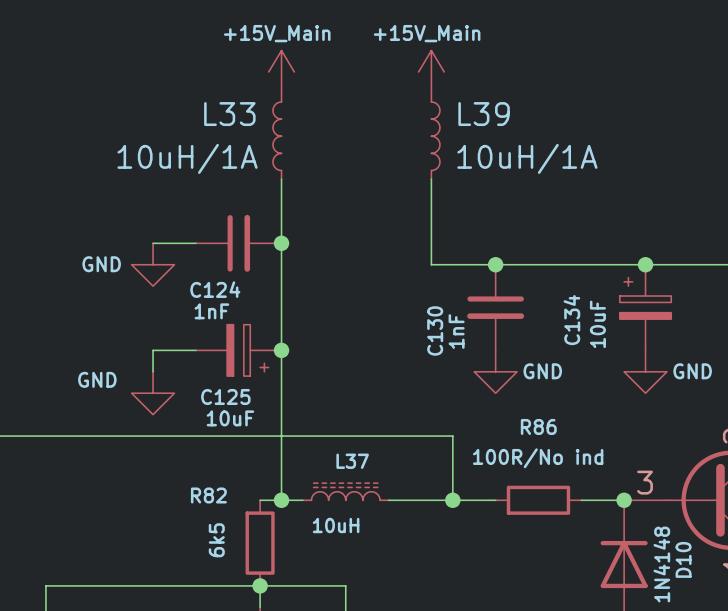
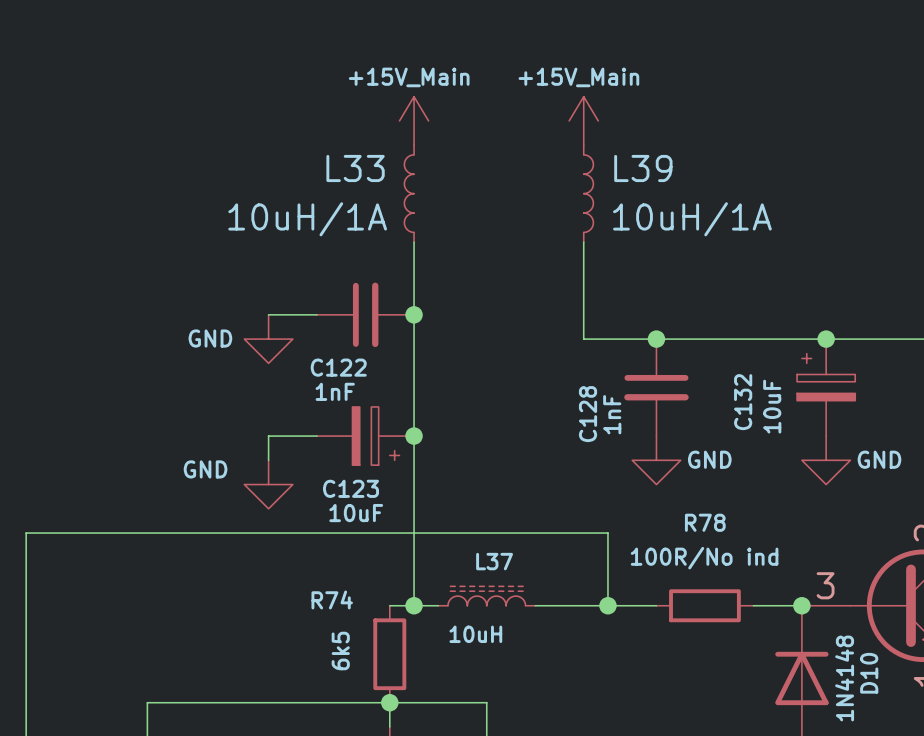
C124 name: C124 (215, 289) -> C122 (338, 367)
C134 name: C134 (571, 320) -> C132 (743, 402)
C130 name: C130 (435, 330) -> C128 (588, 414)
C125 name: C125 (225, 396) -> C123 (351, 488)
R86 name: R86 (538, 426) -> R78 (705, 522)
R82 name: R82 (208, 495) -> R74 (332, 599)

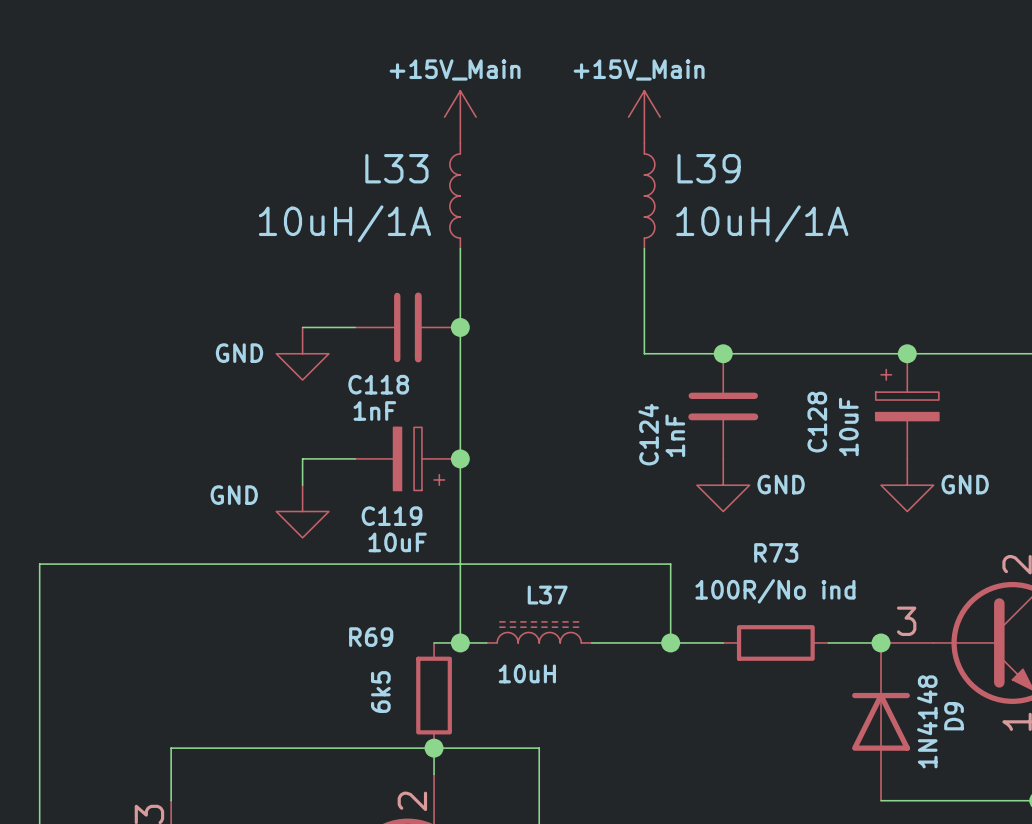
C122 name: C122 (338, 367) -> C118 (378, 384)
C132 name: C132 (743, 402) -> C128 (817, 422)
C128 name: C128 (588, 414) -> C124 (648, 434)
C123 name: C123 (351, 488) -> C119 (391, 516)
R78 name: R78 (705, 522) -> R73 (776, 552)
R74 name: R74 (332, 599) -> R69 (371, 637)
D10 name: D10 (869, 673) -> D9 (954, 716)

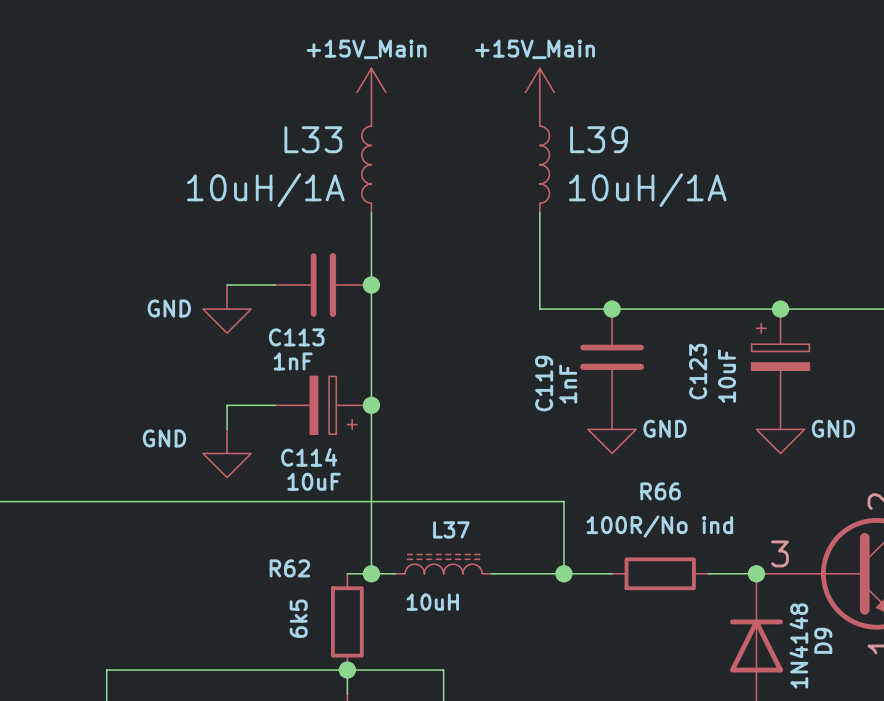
C118 name: C118 (378, 384) -> C113 (296, 337)
C128 name: C128 (817, 422) -> C123 (698, 371)
C124 name: C124 (648, 434) -> C119 (544, 383)
C119 name: C119 (391, 516) -> C114 (309, 457)
R73 name: R73 (776, 552) -> R66 (660, 491)
R69 name: R69 (371, 637) -> R62 (289, 568)

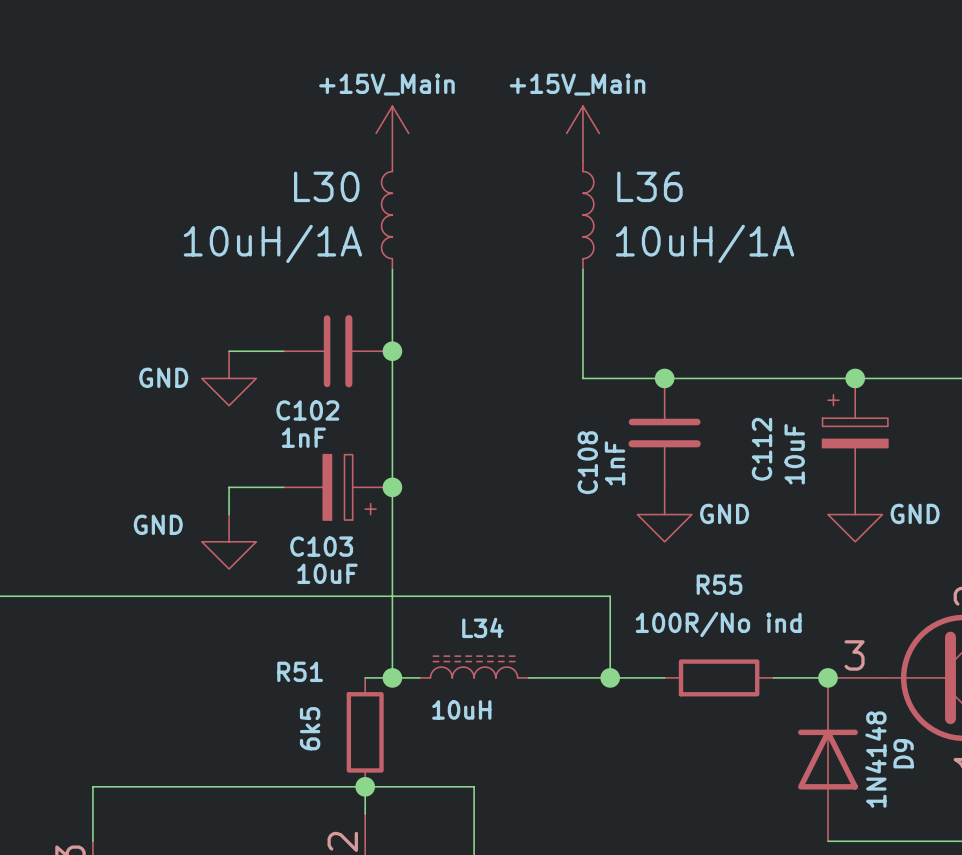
L33 name: L33 (313, 139) -> L30 (326, 186)
L39 name: L39 (599, 139) -> L36 (649, 186)
C113 name: C113 (296, 337) -> C102 (307, 410)
C123 name: C123 (698, 371) -> C112 (762, 449)
C119 name: C119 (544, 383) -> C108 (587, 462)
C114 name: C114 (309, 457) -> C103 (321, 546)
R66 name: R66 (660, 491) -> R55 (719, 584)
L37 name: L37 (451, 529) -> L34 (482, 627)
R62 name: R62 (289, 568) -> R51 (300, 671)

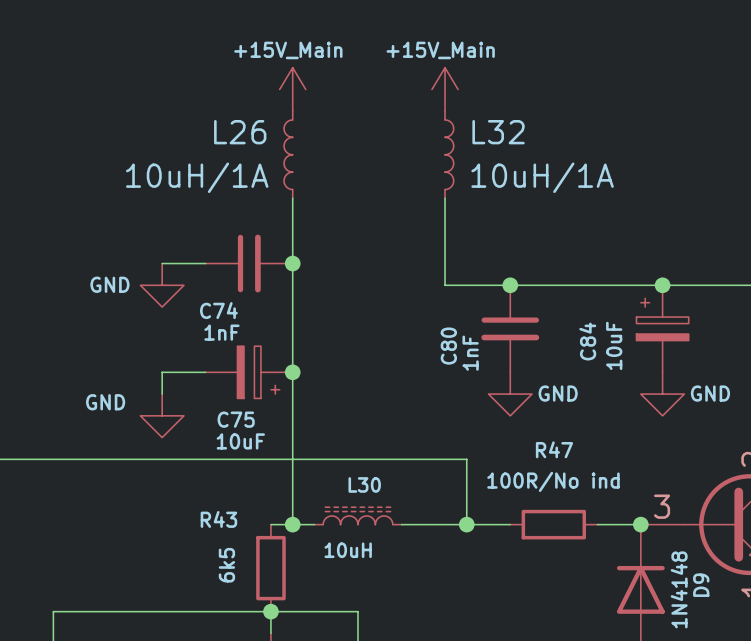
L30 name: L30 (326, 186) -> L26 (240, 132)
L36 name: L36 (649, 186) -> L32 (498, 132)
C102 name: C102 (307, 410) -> C74 (218, 310)
C112 name: C112 (762, 449) -> C84 (587, 341)
C108 name: C108 (587, 462) -> C80 (448, 346)
C103 name: C103 (321, 546) -> C75 (236, 419)
R55 name: R55 (719, 584) -> R47 (554, 449)
L34 name: L34 (482, 627) -> L30 (364, 484)
R51 name: R51 (300, 671) -> R43 (218, 519)

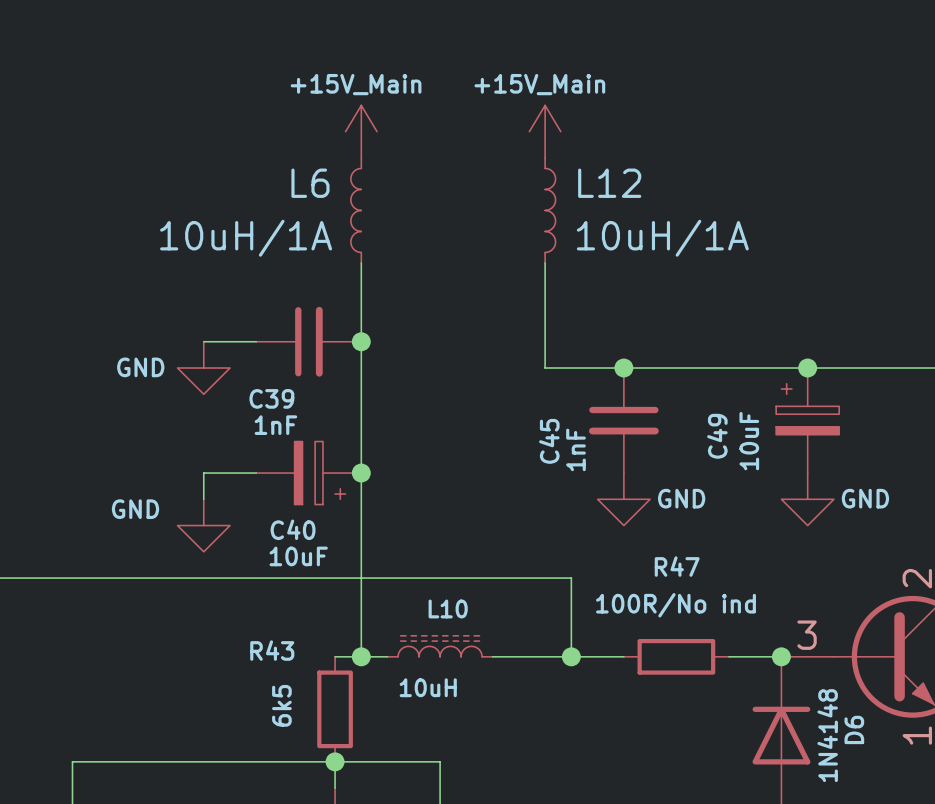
L26 name: L26 (240, 132) -> L6 (310, 183)
L32 name: L32 (498, 132) -> L12 (609, 183)
C74 name: C74 (218, 310) -> C39 (271, 398)
C84 name: C84 (587, 341) -> C49 (717, 436)
C80 name: C80 (448, 346) -> C45 (549, 441)
C75 name: C75 (236, 419) -> C40 (293, 529)
L30 name: L30 (364, 484) -> L10 (448, 608)
D9 name: D9 (701, 585) -> D6 (854, 729)

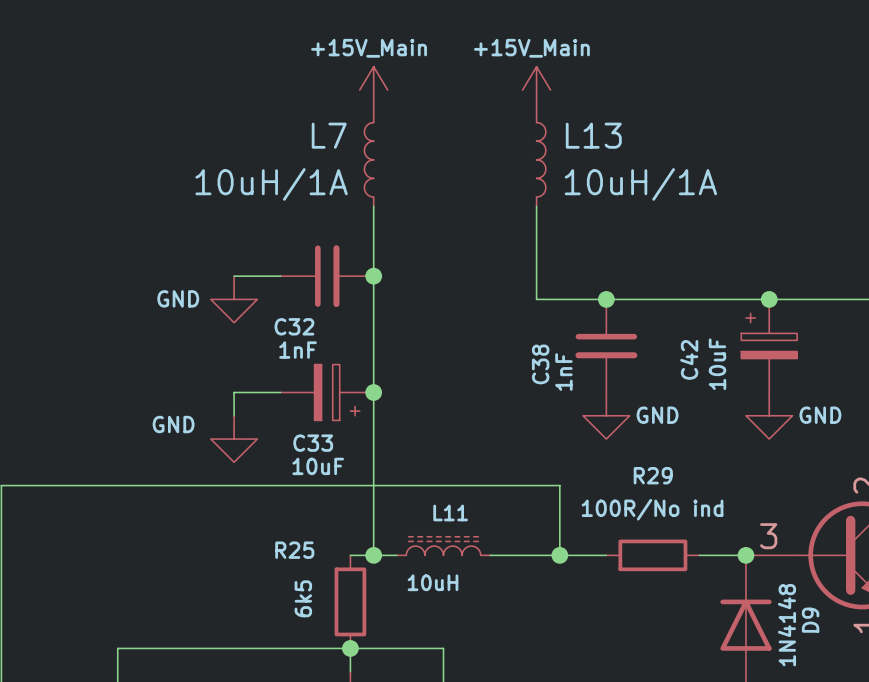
L6 name: L6 (310, 183) -> L7 (329, 135)
L12 name: L12 (609, 183) -> L13 (593, 135)
C39 name: C39 (271, 398) -> C32 (294, 326)
C49 name: C49 (717, 436) -> C42 (689, 359)
C45 name: C45 (549, 441) -> C38 (540, 364)
C40 name: C40 (293, 529) -> C33 (313, 443)
R47 name: R47 (677, 566) -> R29 (653, 475)
L10 name: L10 (448, 608) -> L11 (450, 512)
R43 name: R43 (272, 650) -> R25 (294, 550)
D6 name: D6 (854, 729) -> D9 (810, 620)

